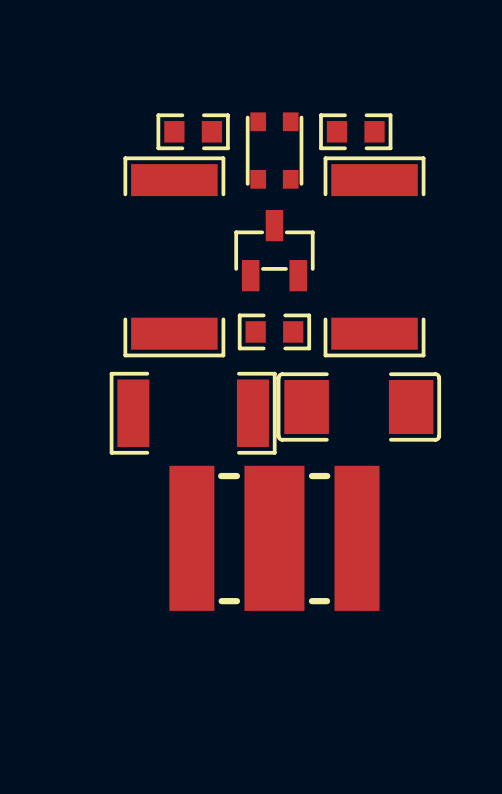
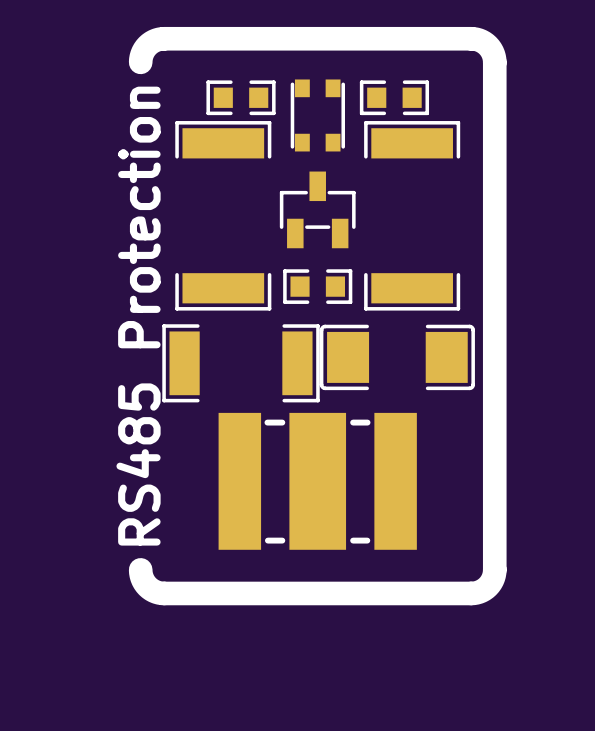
line: none -> (140, 62) (142, 54) (147, 45) (154, 41) (164, 38) (473, 38) (487, 45) (492, 52) (494, 62) (494, 569) (491, 582) (483, 589) (471, 593) (164, 593) (154, 591) (147, 586) (142, 577) (140, 569)
text: none -> RS485 Protection (138, 316)

